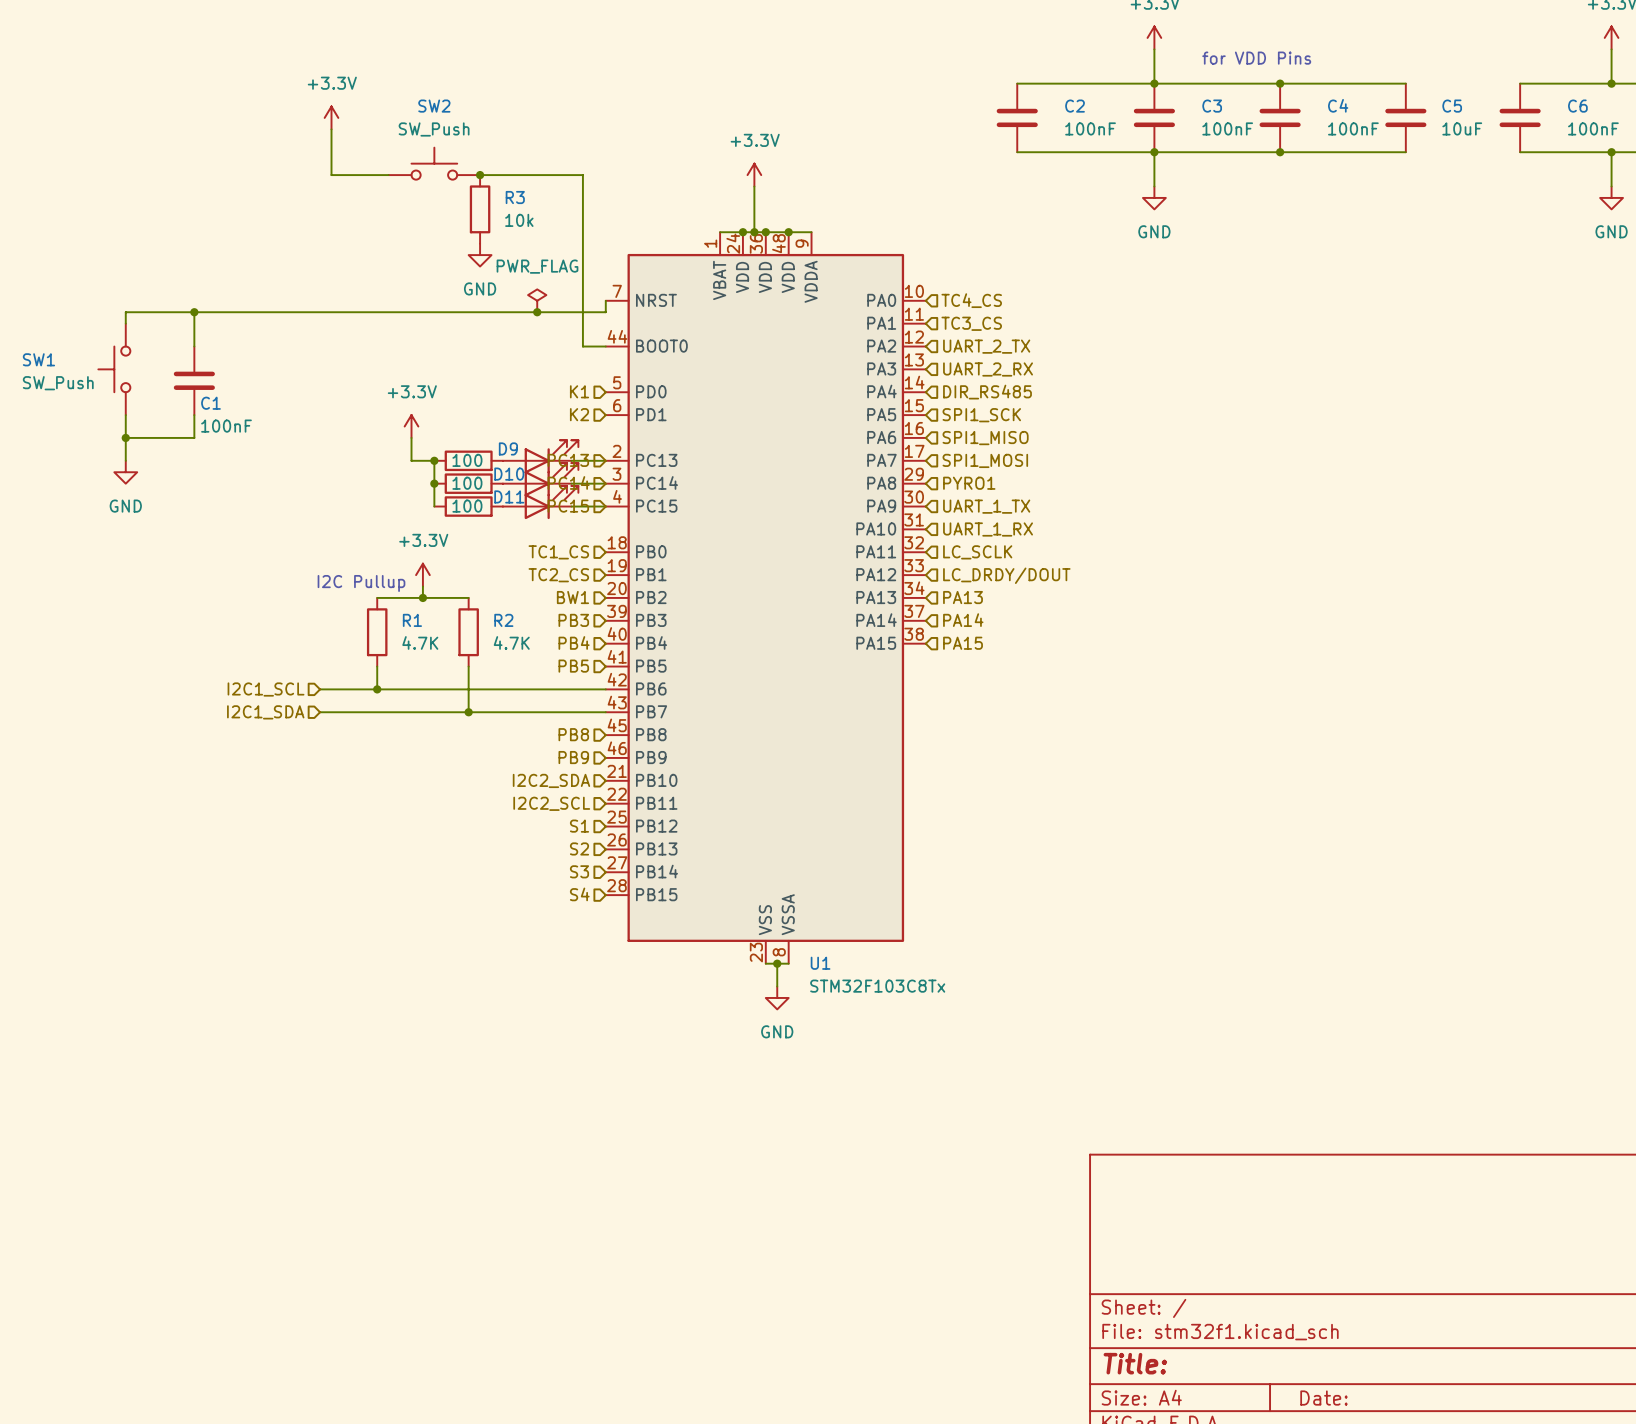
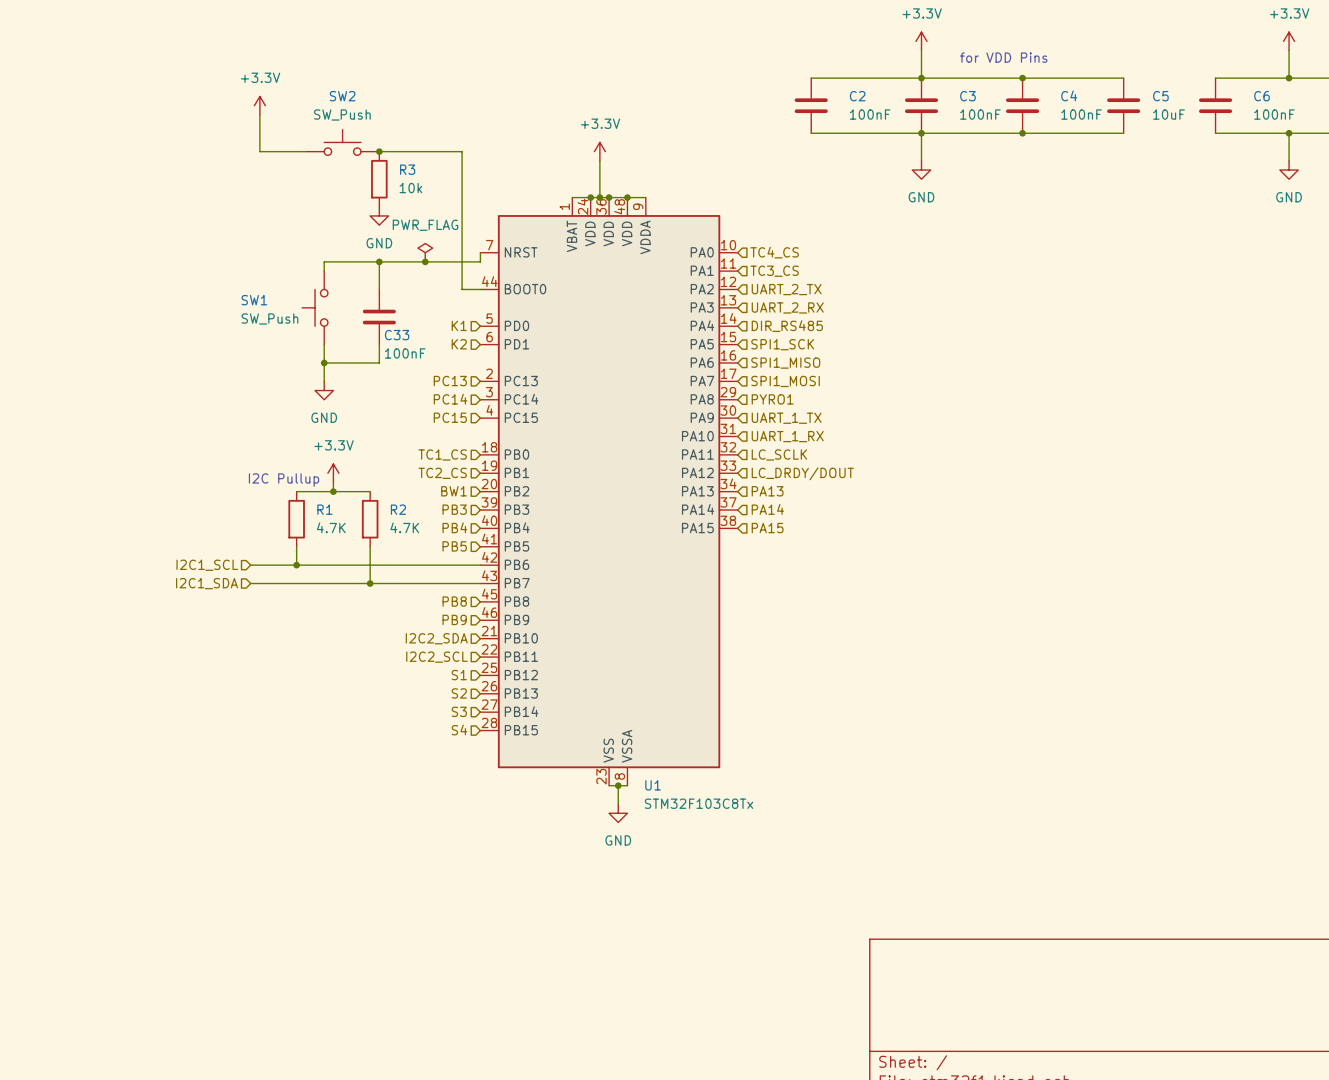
wire: (194, 312) (194, 346) -> none
junction: (194, 312) -> none
wire: (411, 312) (125, 312) (125, 323) -> (324, 261) (324, 271)
wire: none -> (379, 261) (379, 289)
junction: none -> (379, 261)
SW1 position: (114, 369) -> (315, 307)
C1: 100nF (194, 380) -> none
C33: none -> 100nF (379, 317)
wire: (125, 415) (125, 460) -> none
wire: (194, 415) (194, 437) (125, 437) -> none
wire: none -> (324, 344) (324, 362) (379, 362) (379, 344)
power symbol: +3.3V (411, 426) -> none
junction: (125, 437) -> none
junction: none -> (324, 362)
D9: (540, 456) -> none
wire: (411, 460) (434, 460) (434, 506) -> none
junction: (434, 460) -> none
part: 100 (468, 460) -> none
wire: (571, 460) (605, 460) -> none
power symbol: GND (125, 472) -> none
power symbol: none -> GND (324, 390)
D10: (540, 479) -> none
junction: (434, 483) -> none
part: 100 (468, 483) -> none
wire: (571, 483) (605, 483) -> none
D11: (540, 502) -> none
part: 100 (468, 506) -> none
wire: (571, 506) (605, 506) -> none

